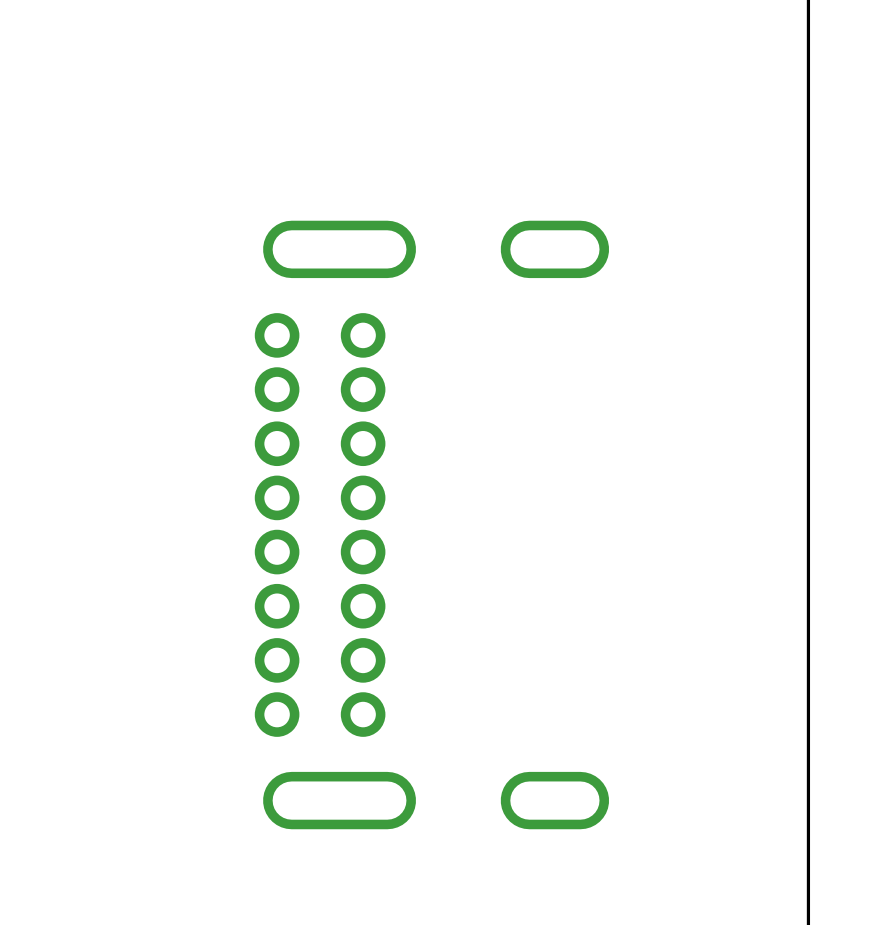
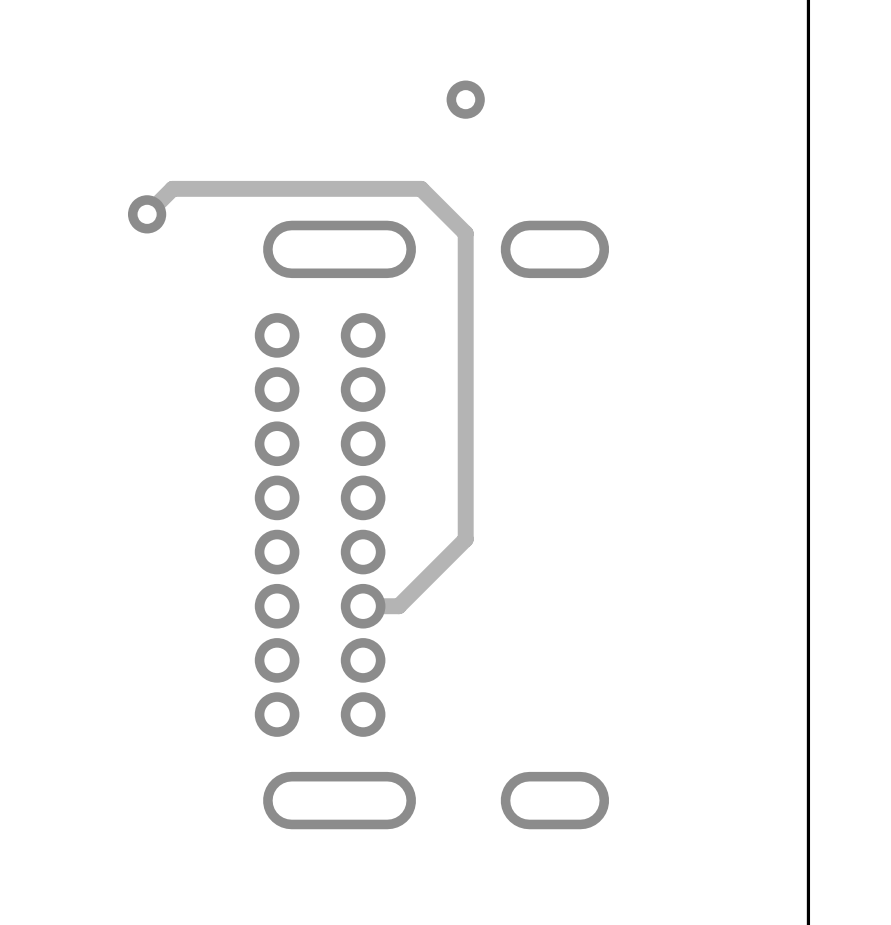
via: none -> (465, 99)
track: none -> (147, 214) (172, 188) (421, 188) (465, 233) (465, 539) (398, 606) (363, 606)
via: none -> (147, 214)

